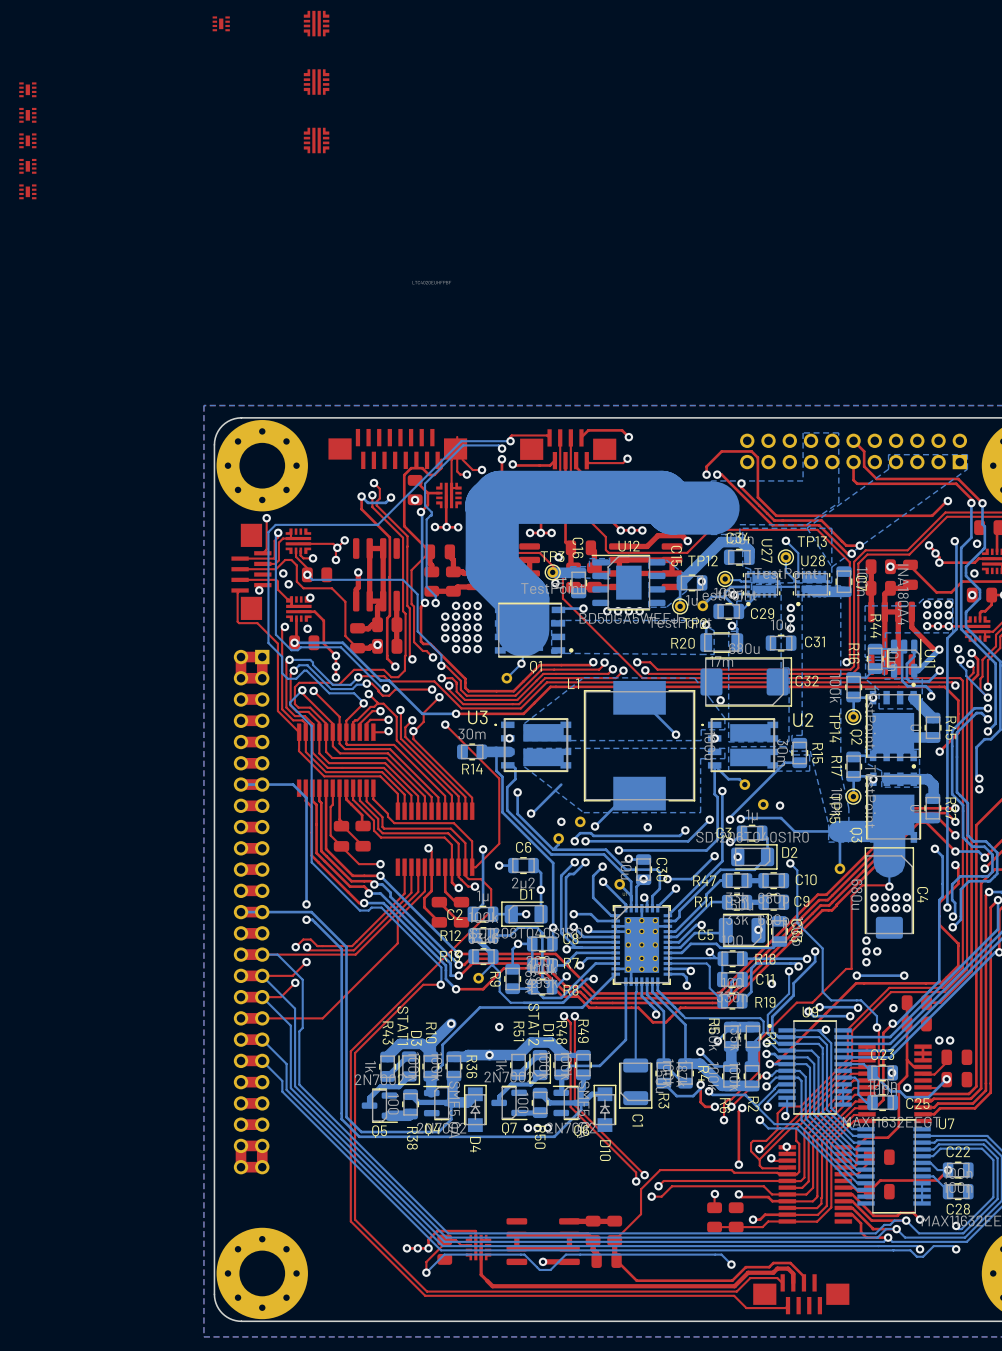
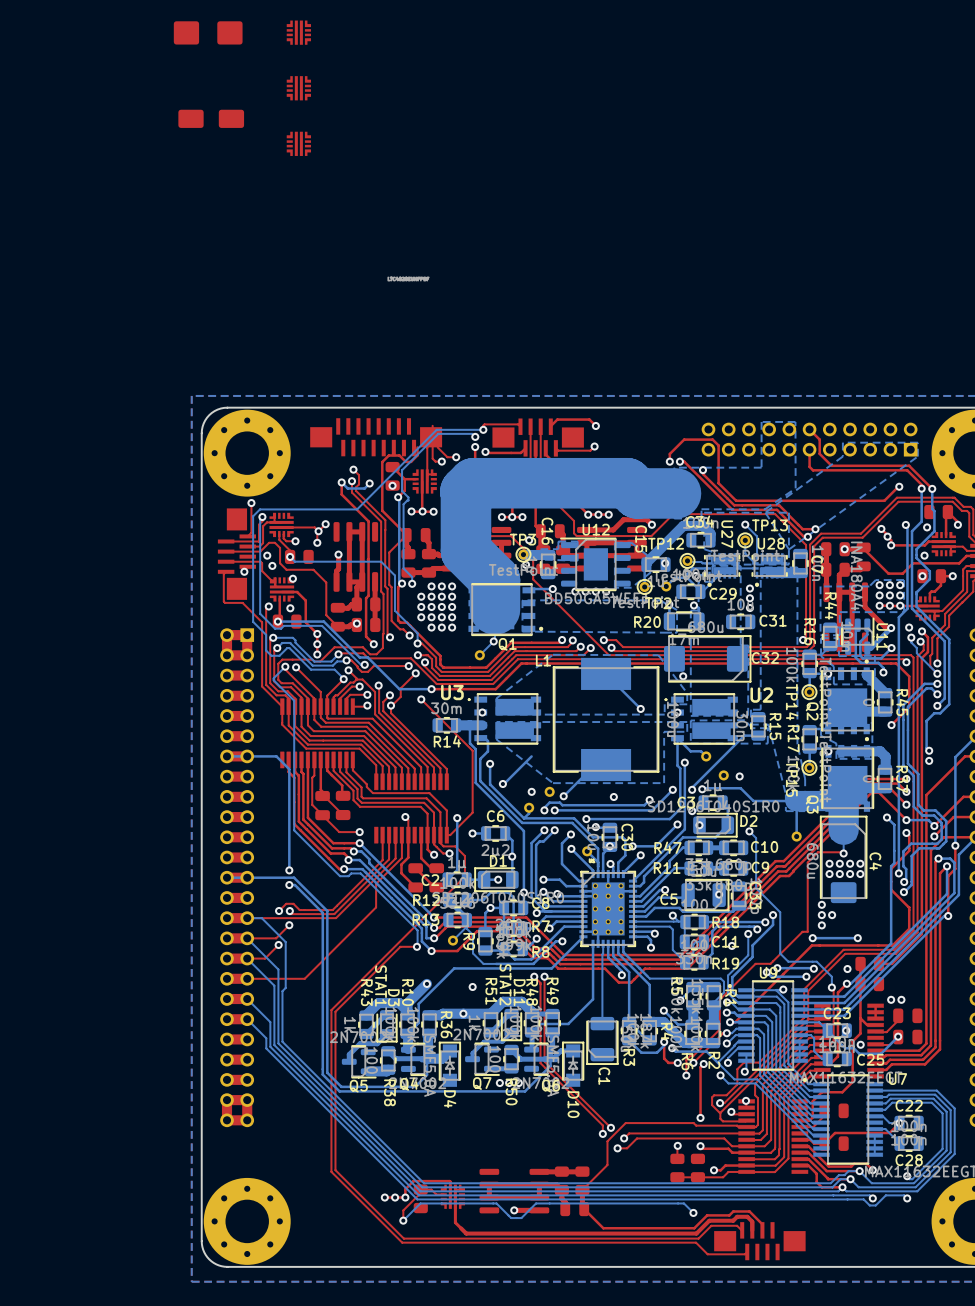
part footprint: [212, 16, 230, 32] -> [173, 21, 243, 45]
part: (27, 89) -> none
part: none -> (211, 118)
part: (27, 115) -> none
part: (27, 140) -> none
part: (27, 166) -> none
part: (27, 191) -> none

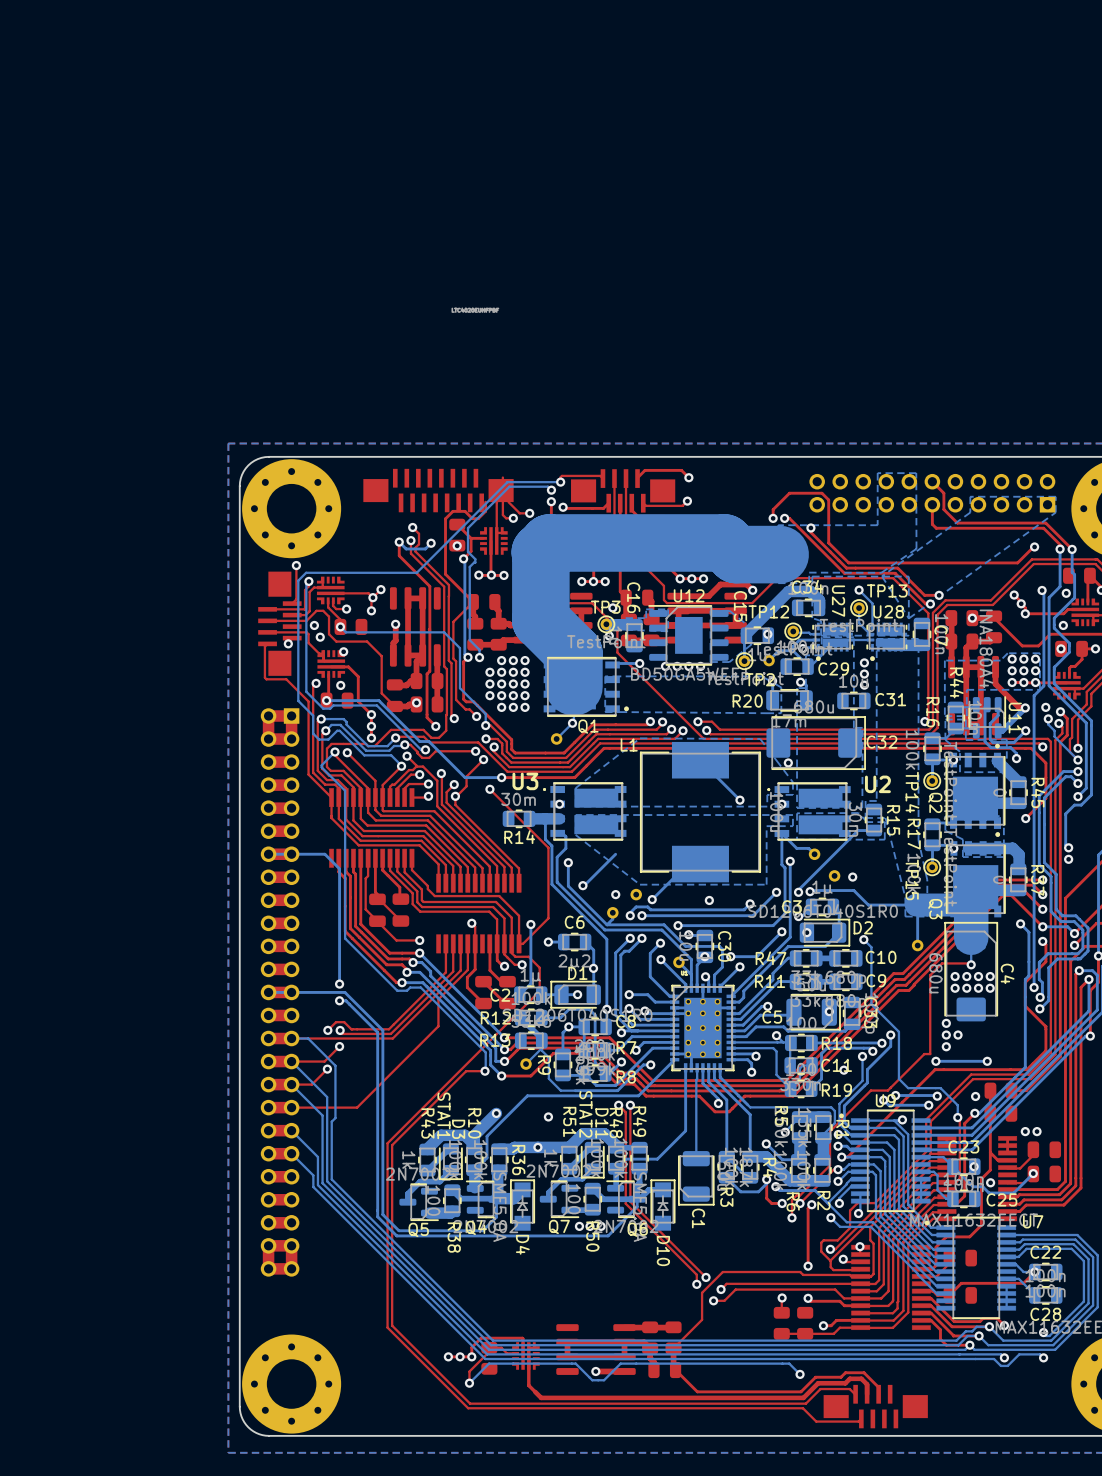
part: (208, 32) -> none
part: (298, 32) -> none
part: (298, 88) -> none
part: (211, 118) -> none
part: (298, 143) -> none

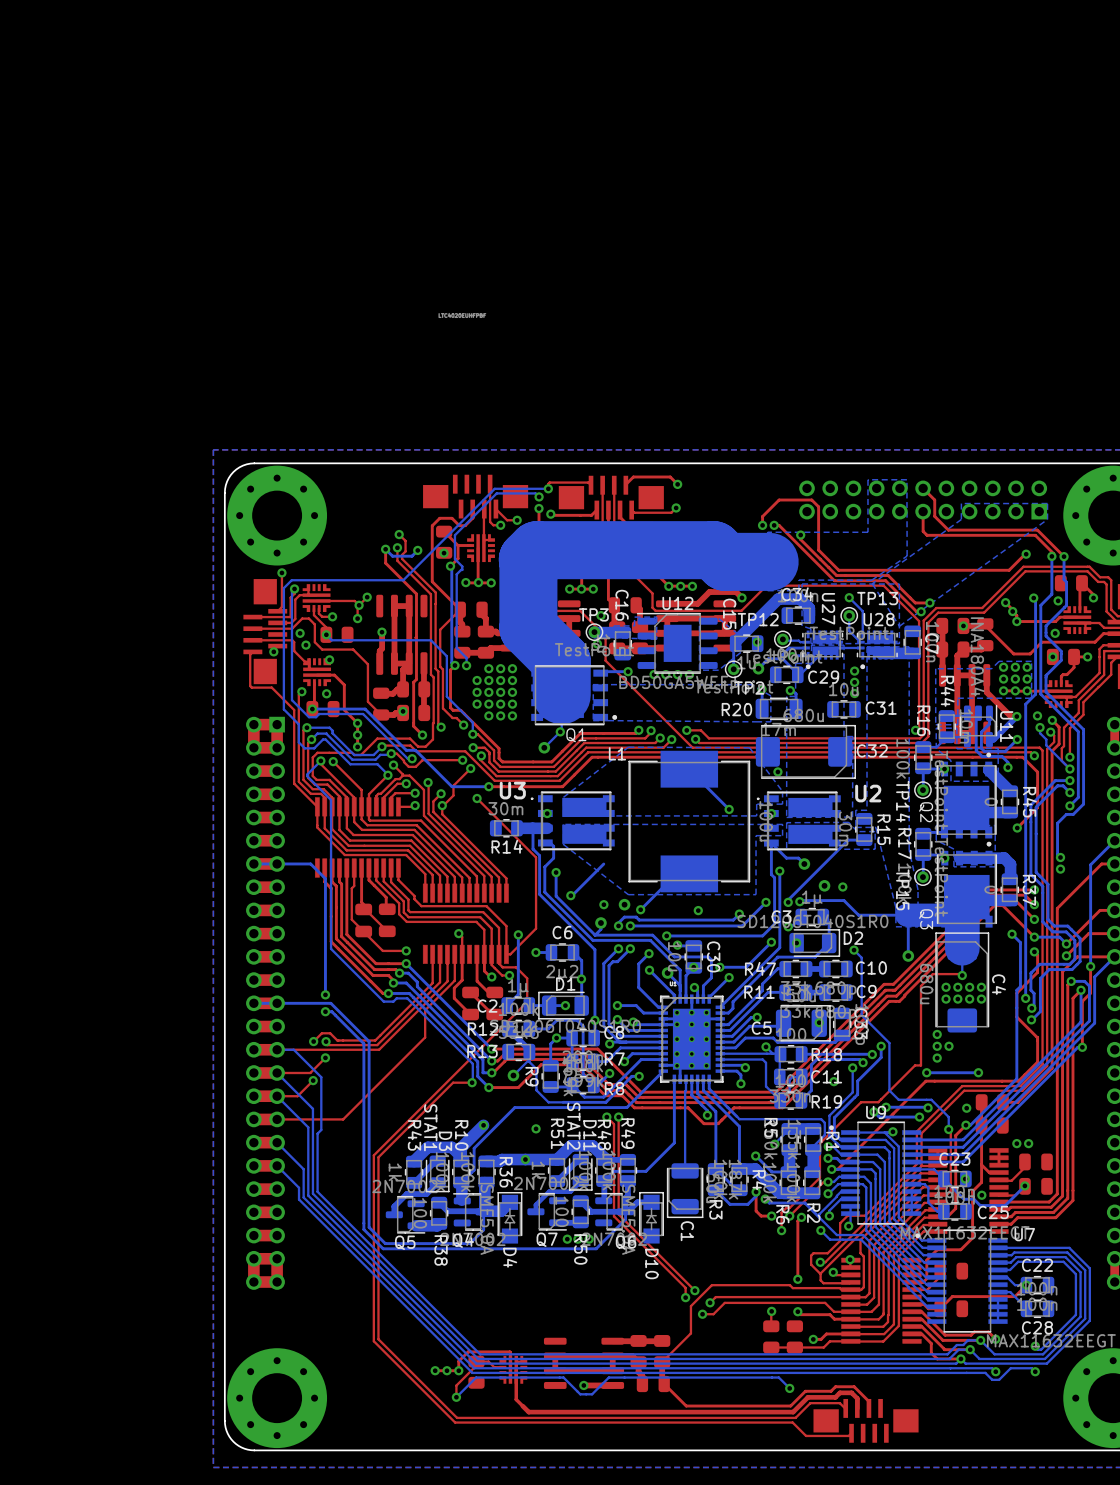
part: none -> (475, 496)
part: (438, 490) -> none

